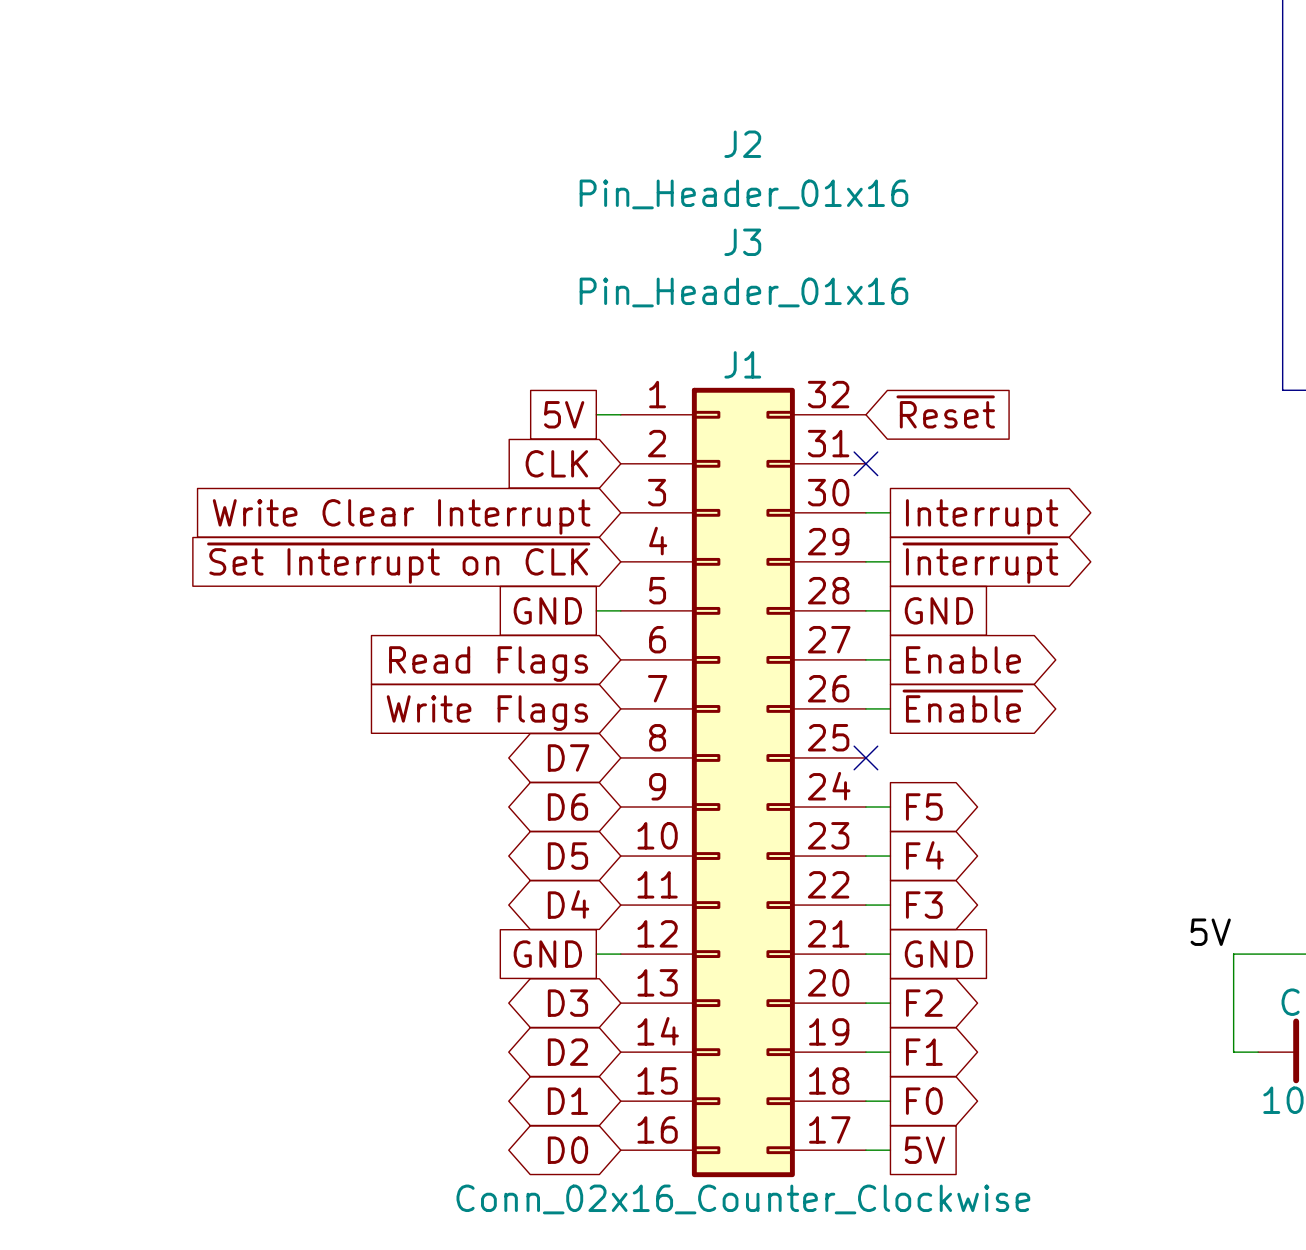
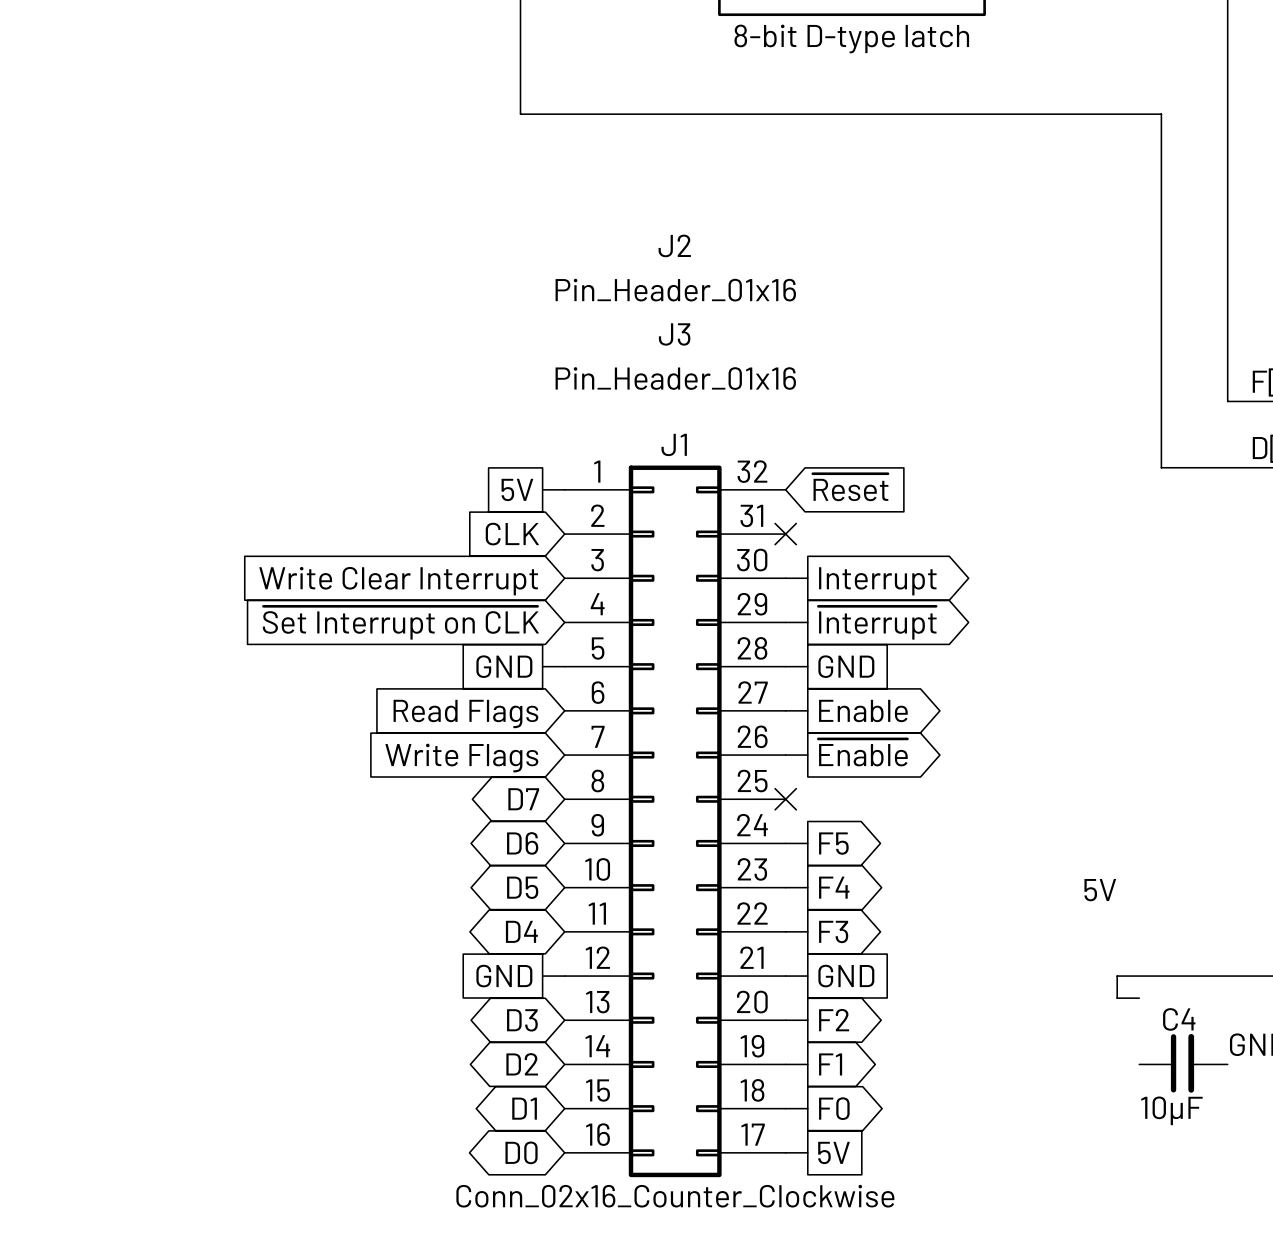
label position: 5V (1210, 932) -> 5V (1100, 890)
wire: (1233, 978) (1233, 1052) (1258, 1052) -> (1117, 998) (1139, 998)

